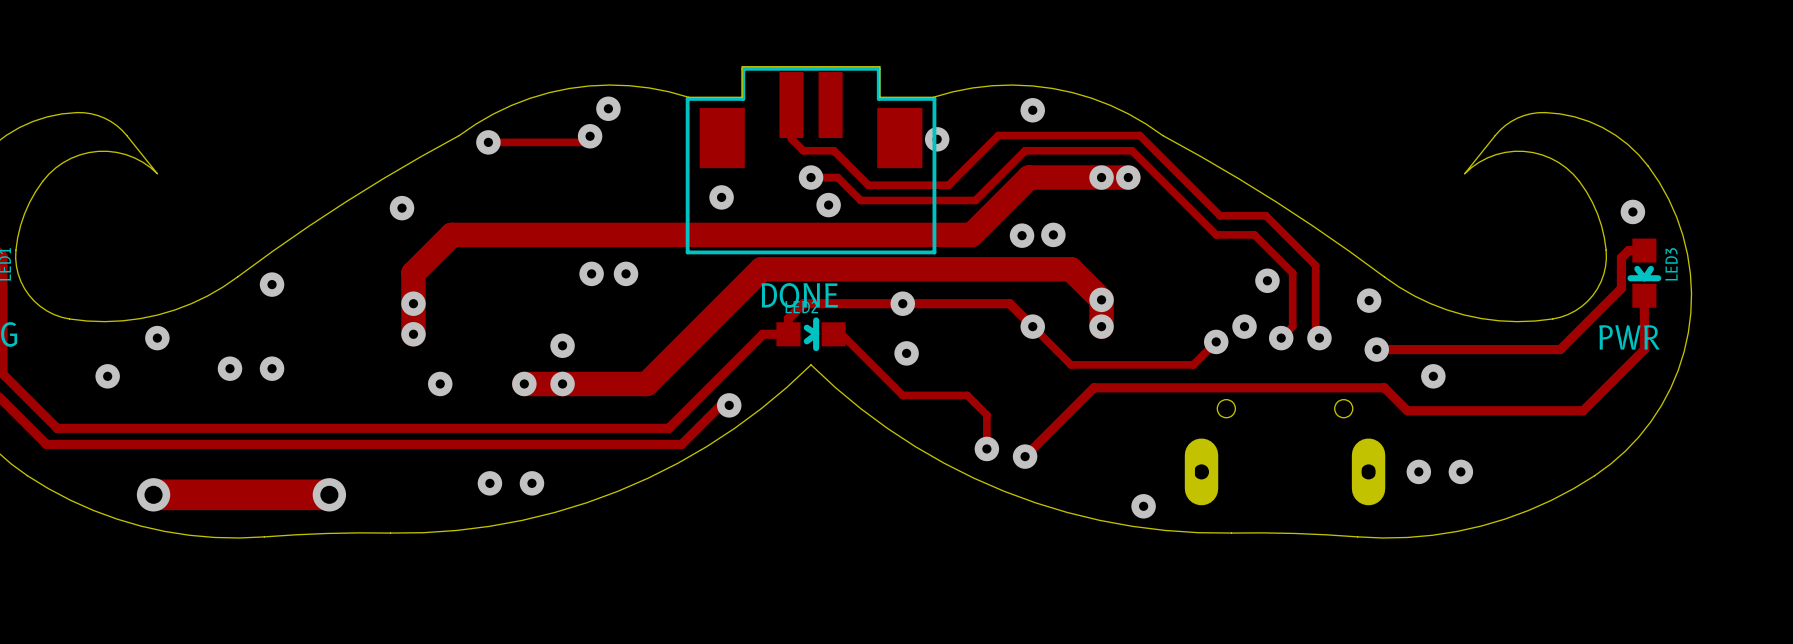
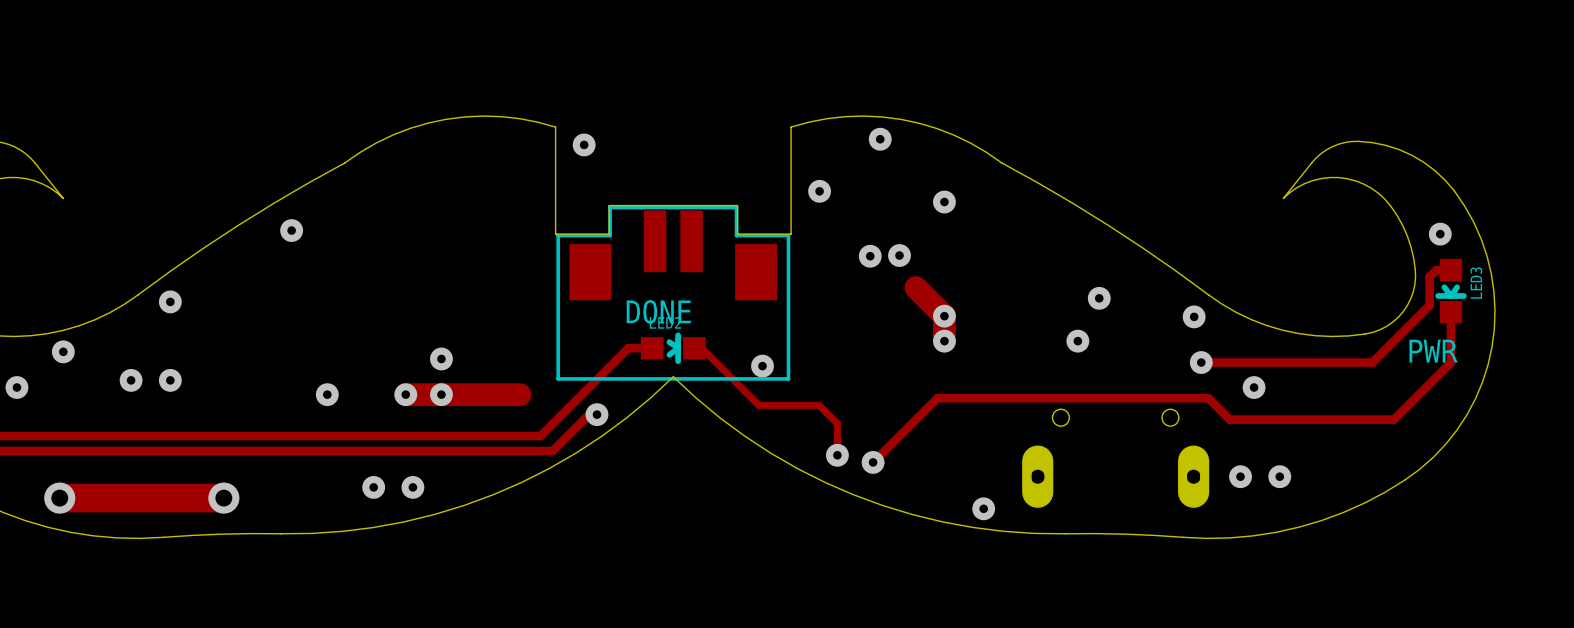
track: (791, 104) (791, 138) (803, 150) (833, 150) (868, 185) (948, 185) (998, 135) (1139, 135) (1220, 215) (1265, 215) (1315, 265) (1315, 334) (1319, 338) -> none
via: (608, 108) -> none
via: none -> (584, 144)
board edge: (459, 135) (493, 114) (511, 105) (530, 98) (569, 88) (609, 85) (629, 85) (649, 88) (688, 97) (742, 97) (742, 66) (879, 66) (879, 97) (933, 97) (972, 88) (992, 85) (1012, 85) (1052, 88) (1091, 98) (1110, 105) (1128, 114) (1162, 135) -> (345, 162) (392, 135) (446, 119) (501, 116) (555, 127) (555, 234) (609, 234) (609, 205) (737, 205) (737, 234) (791, 234) (791, 127) (827, 118) (882, 116) (918, 123) (970, 142) (1001, 162)
track: (590, 136) (583, 142) (488, 142) -> none
via: (590, 136) -> none
via position: (937, 139) -> (819, 191)
via: (488, 142) -> none
part position: (811, 160) -> (673, 293)
track: (811, 177) (837, 177) (860, 200) (975, 200) (1025, 150) (1132, 150) (1216, 234) (1254, 234) (1292, 273) (1292, 326) (1281, 338) -> none
via: (811, 177) -> none
track: (1128, 177) (1028, 177) (971, 234) (451, 234) (413, 273) (413, 334) -> none
via: (1128, 177) -> none
via: (721, 197) -> none
via: (828, 205) -> none
track: (1070, 269) (761, 269) (646, 383) -> none
via: (591, 273) -> none
via: (626, 273) -> none
via: (413, 303) -> none
via: (902, 303) -> none
via: (1032, 326) -> none
via: (413, 334) -> none
track: (788, 334) (788, 318) (803, 303) (1009, 303) (1070, 364) (1193, 364) (1216, 341) -> none
via: (1281, 338) -> none
via: (1319, 338) -> none
via: (1216, 341) -> none

